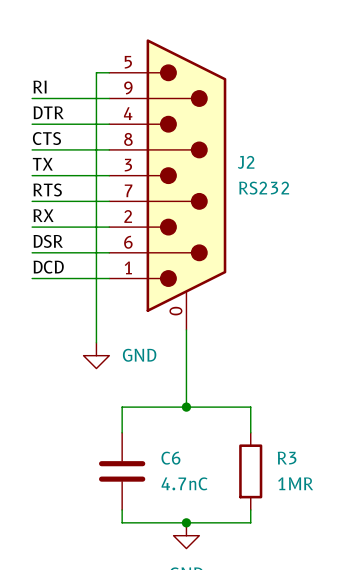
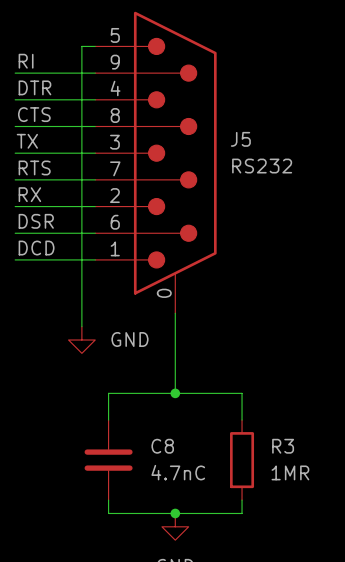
J2 name: J2 (246, 162) -> J5 (240, 139)
C6 name: C6 (170, 458) -> C8 (162, 446)

